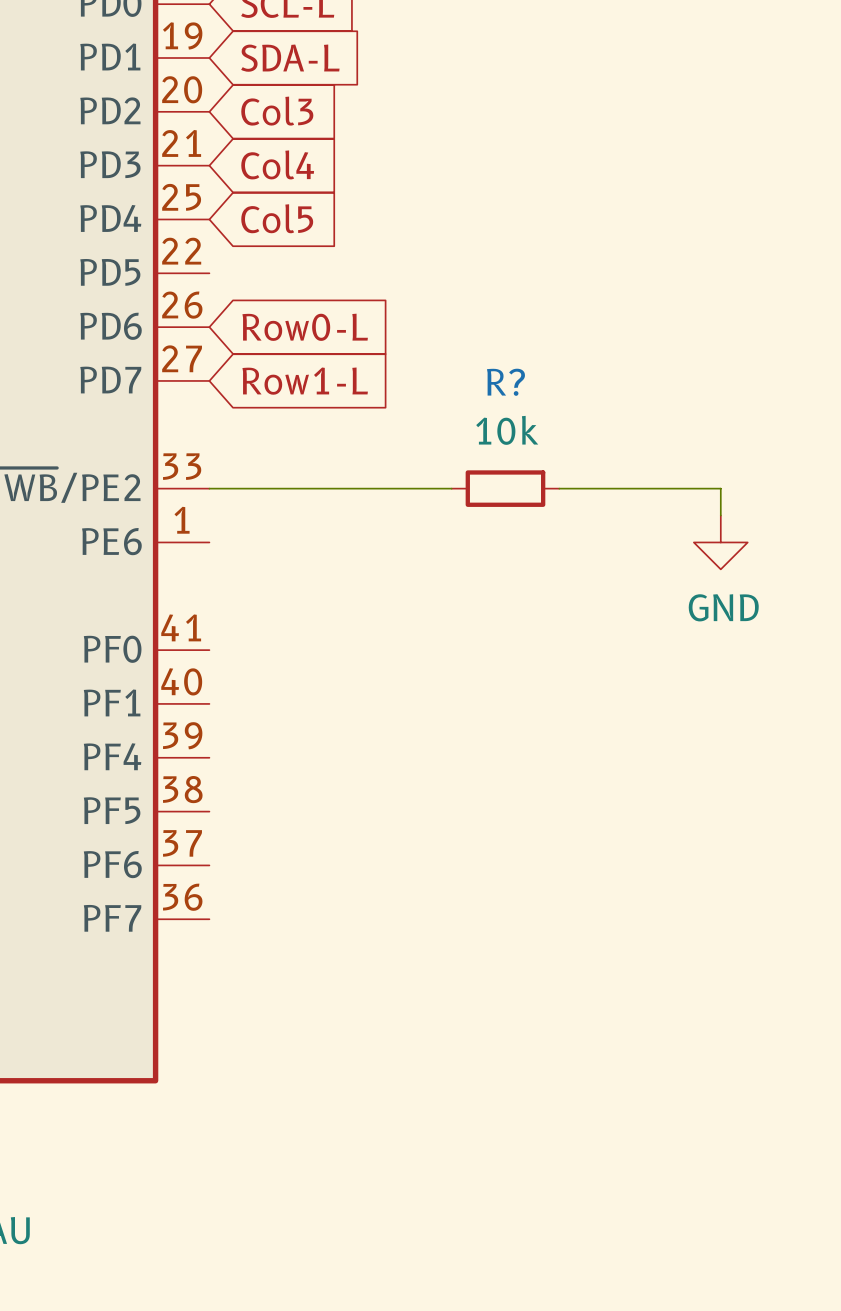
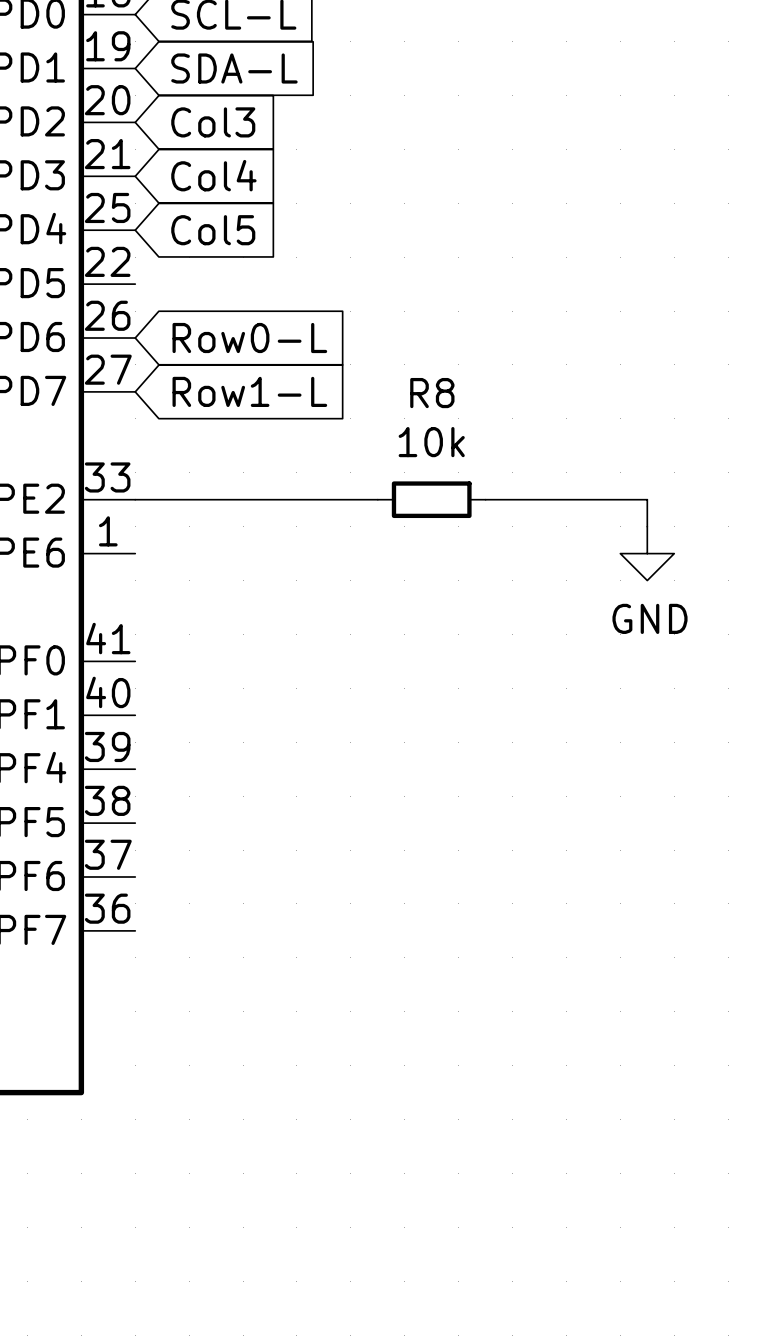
R? name: R? (505, 382) -> R8 (432, 393)

